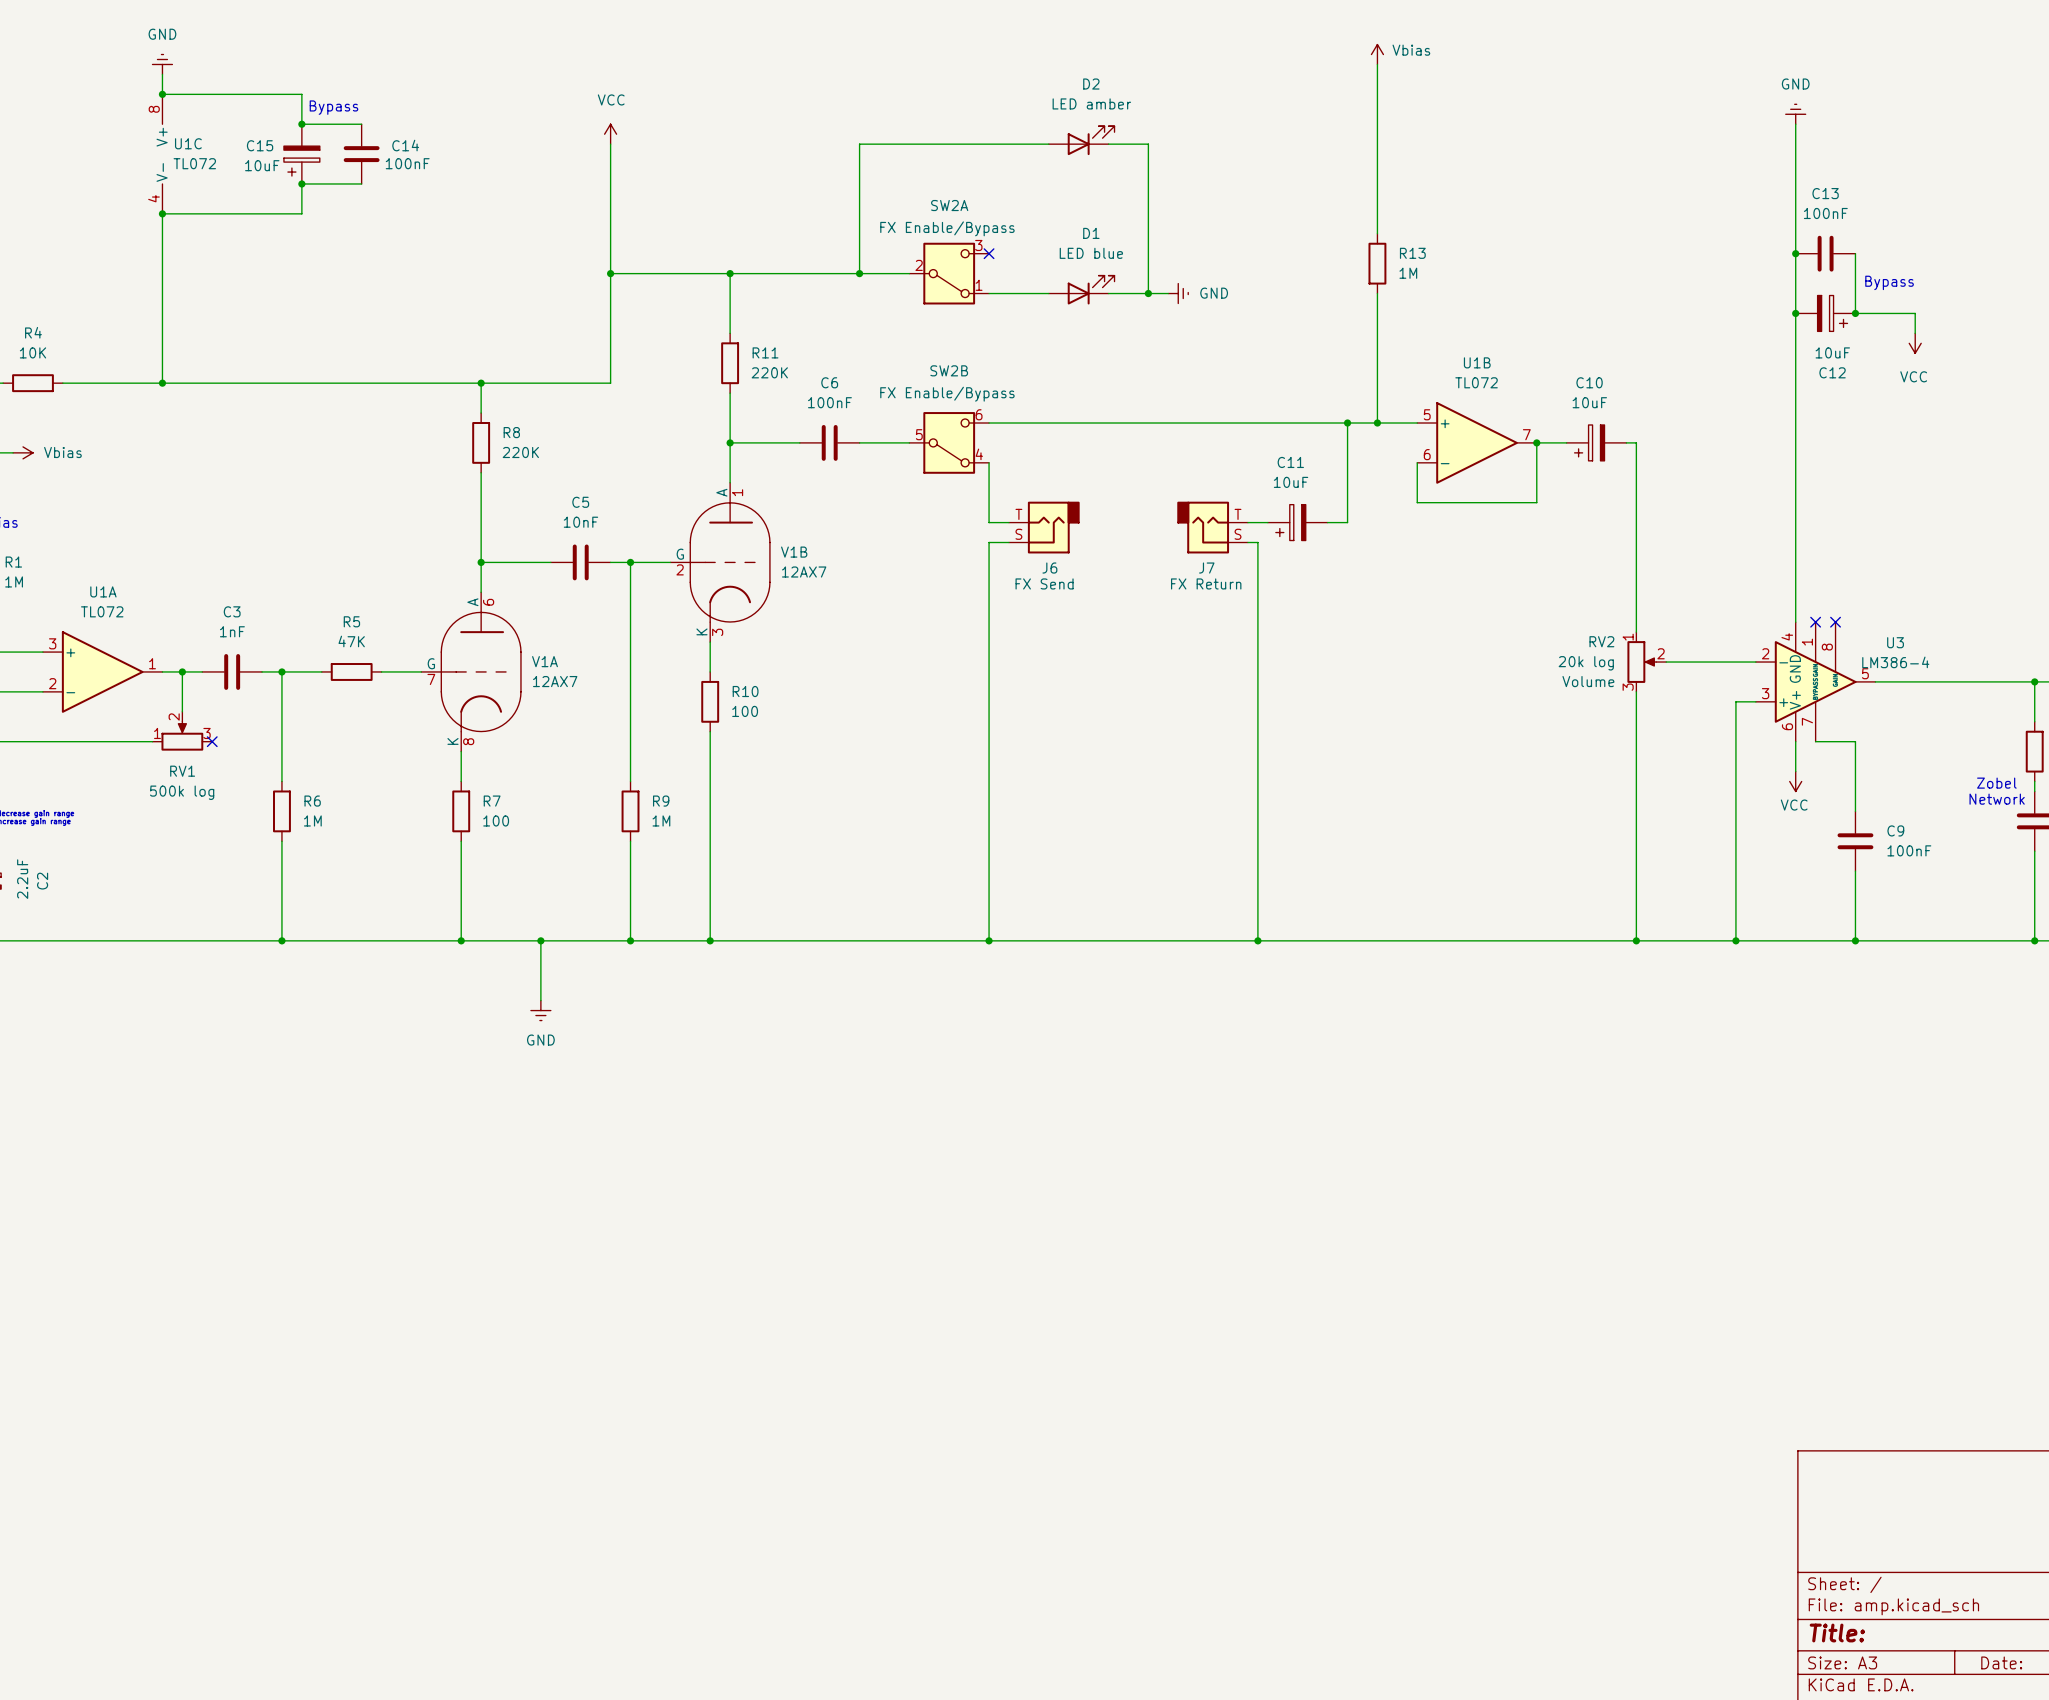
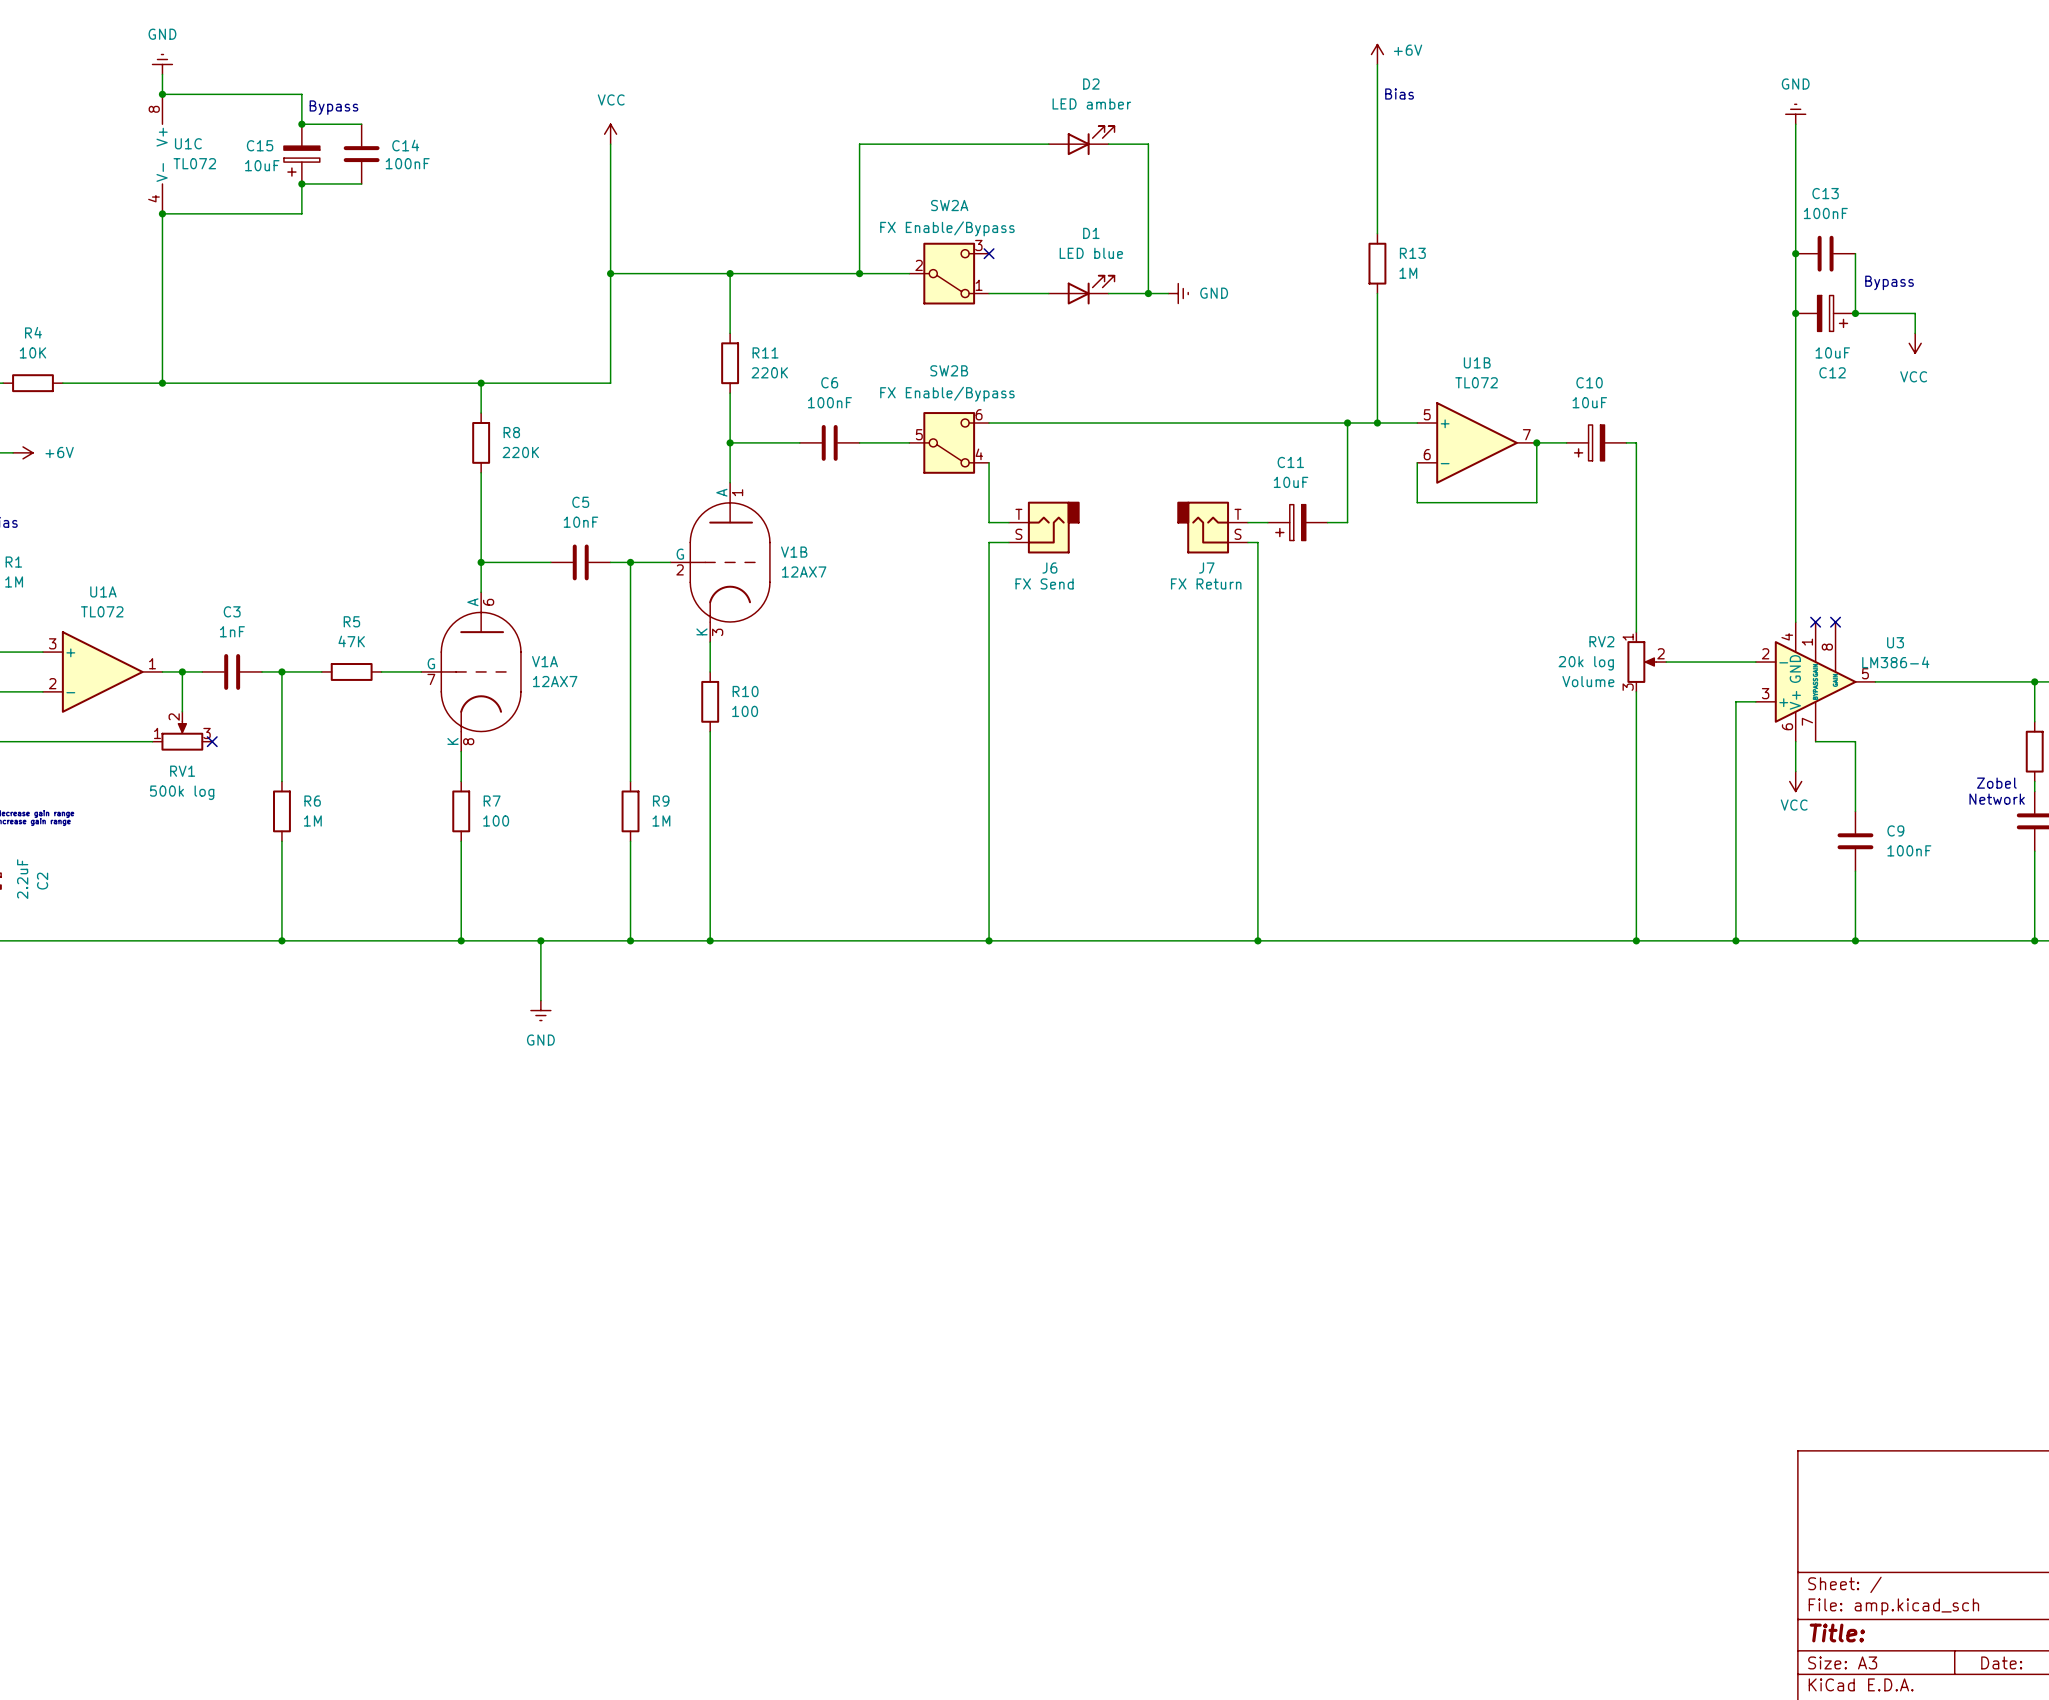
power symbol: Vbias (1377, 54) -> +6V (1377, 54)
text: none -> Bias (1399, 94)
power symbol: Vbias (23, 452) -> +6V (23, 452)

